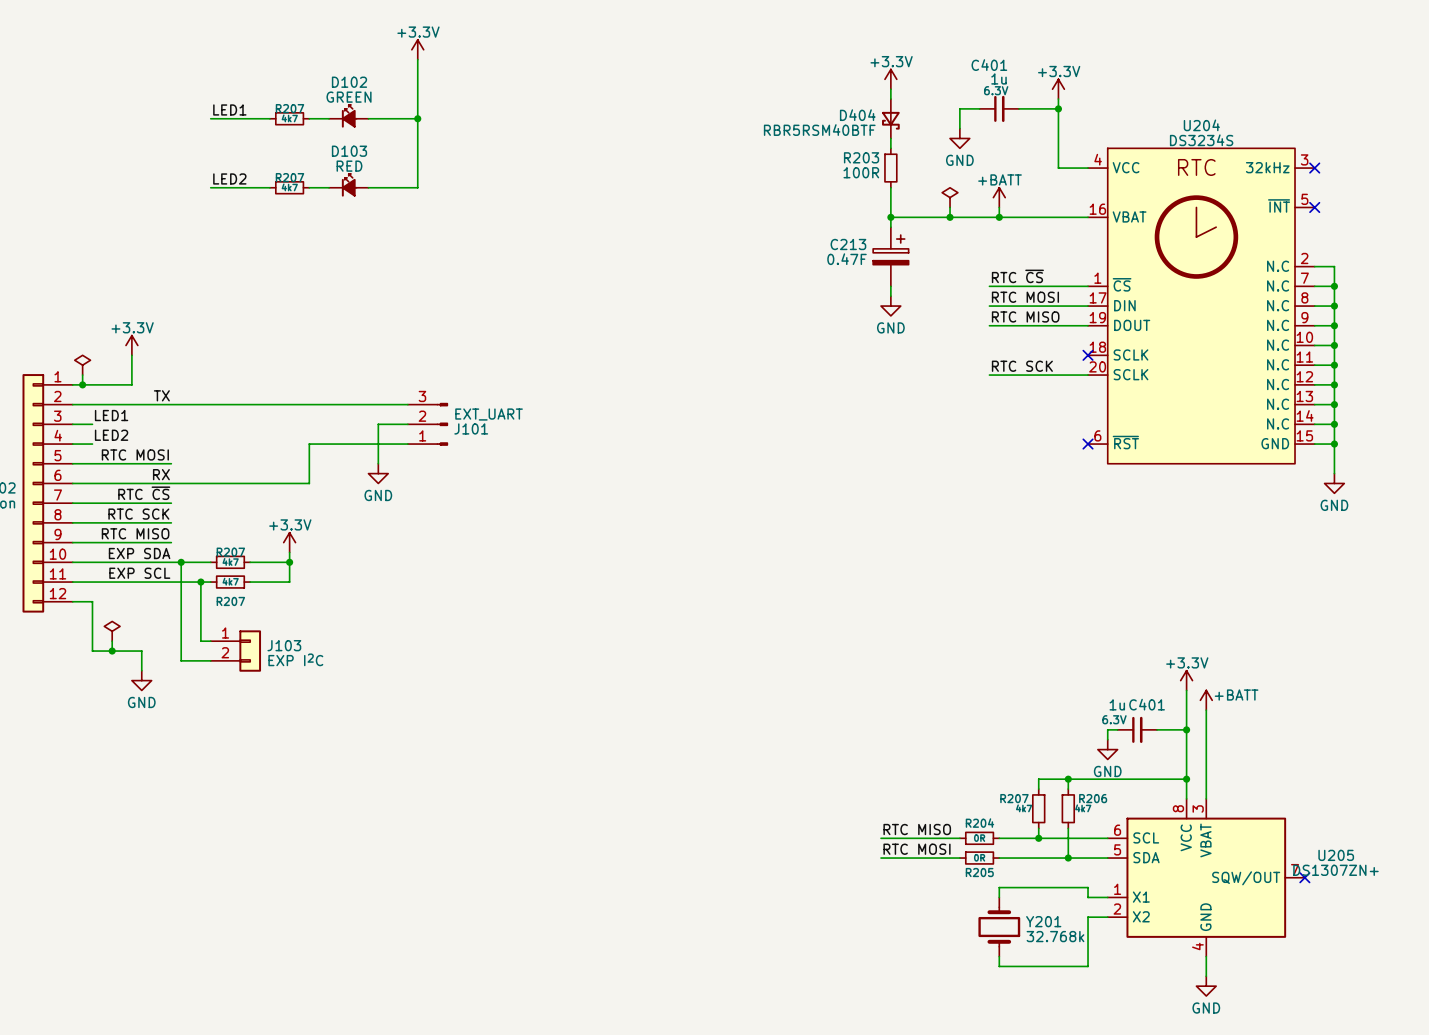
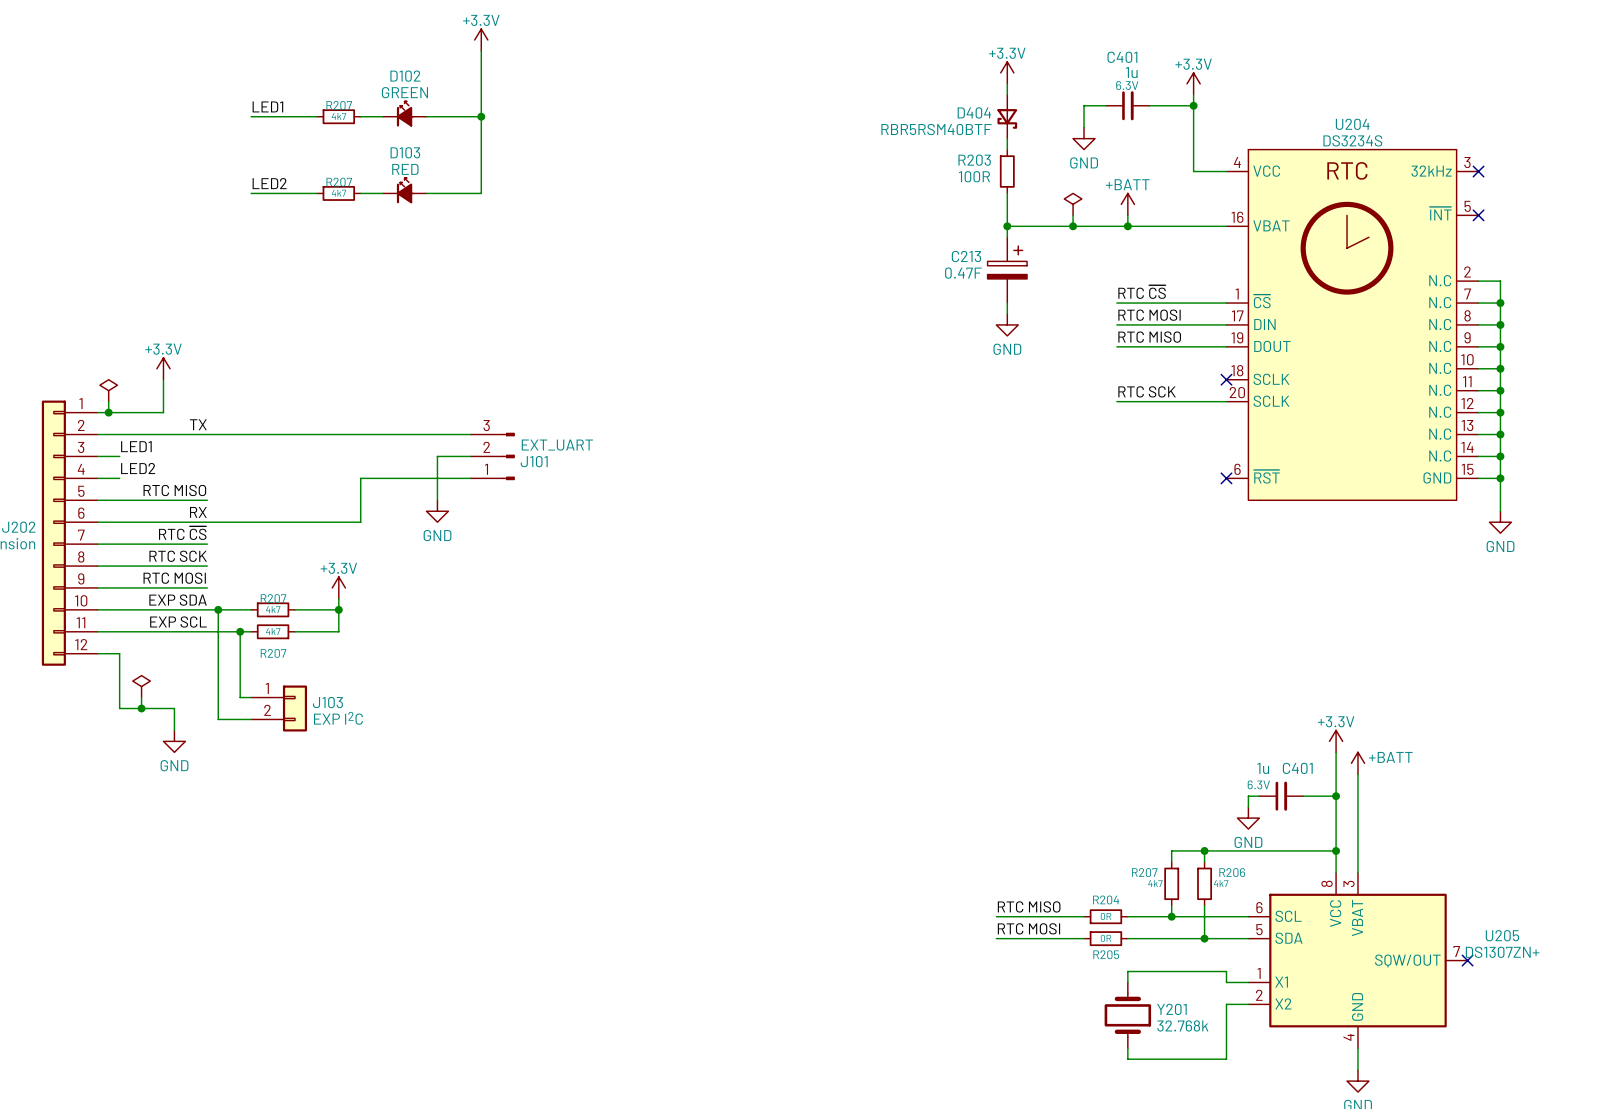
label: RTC MOSI (135, 454) -> RTC MISO (174, 490)
label: RTC MISO (135, 533) -> RTC MOSI (174, 578)

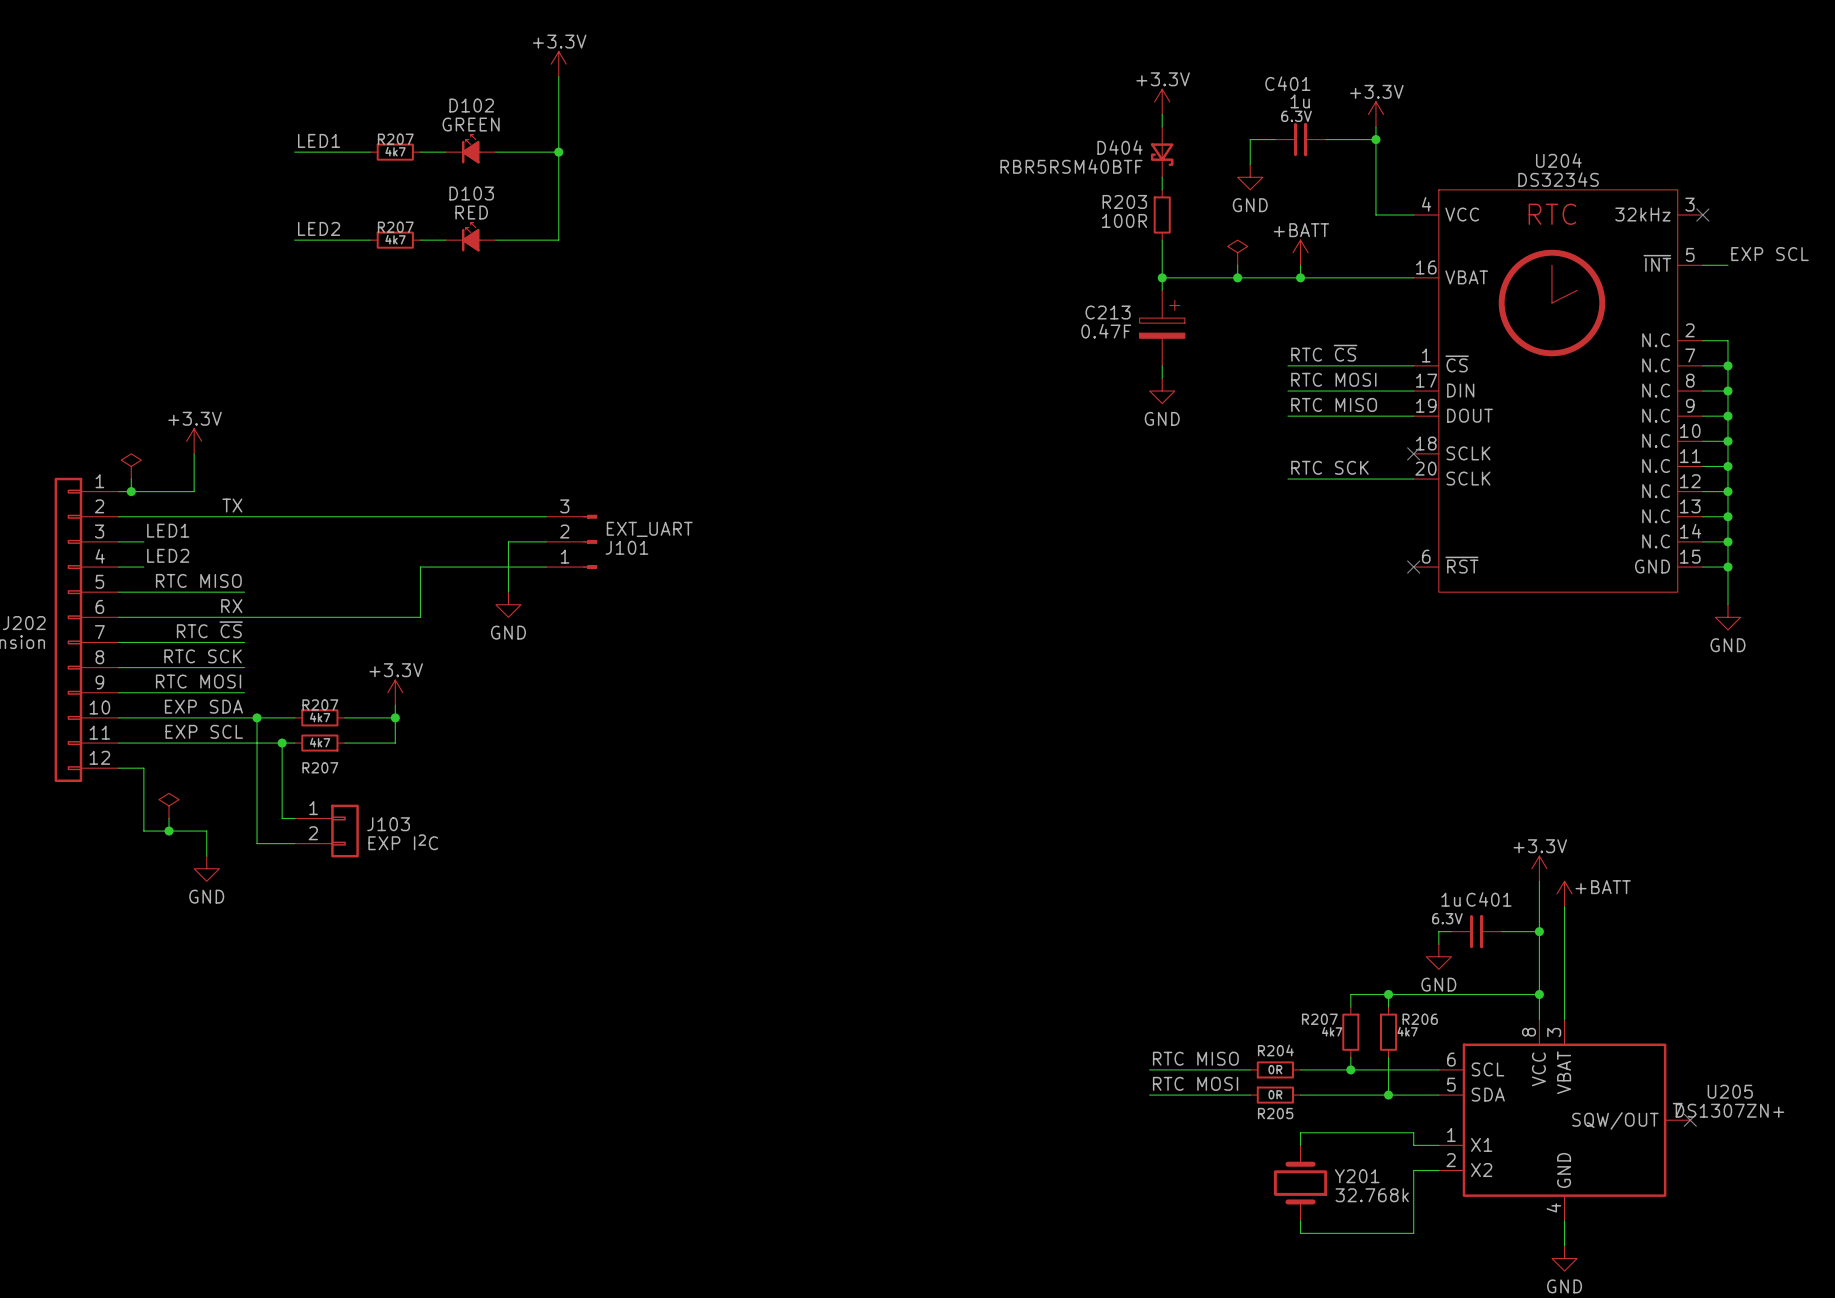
label: none -> EXP SCL (1770, 254)
wire: none -> (1702, 265) (1727, 265)
no-connect mark: (1478, 215) -> none

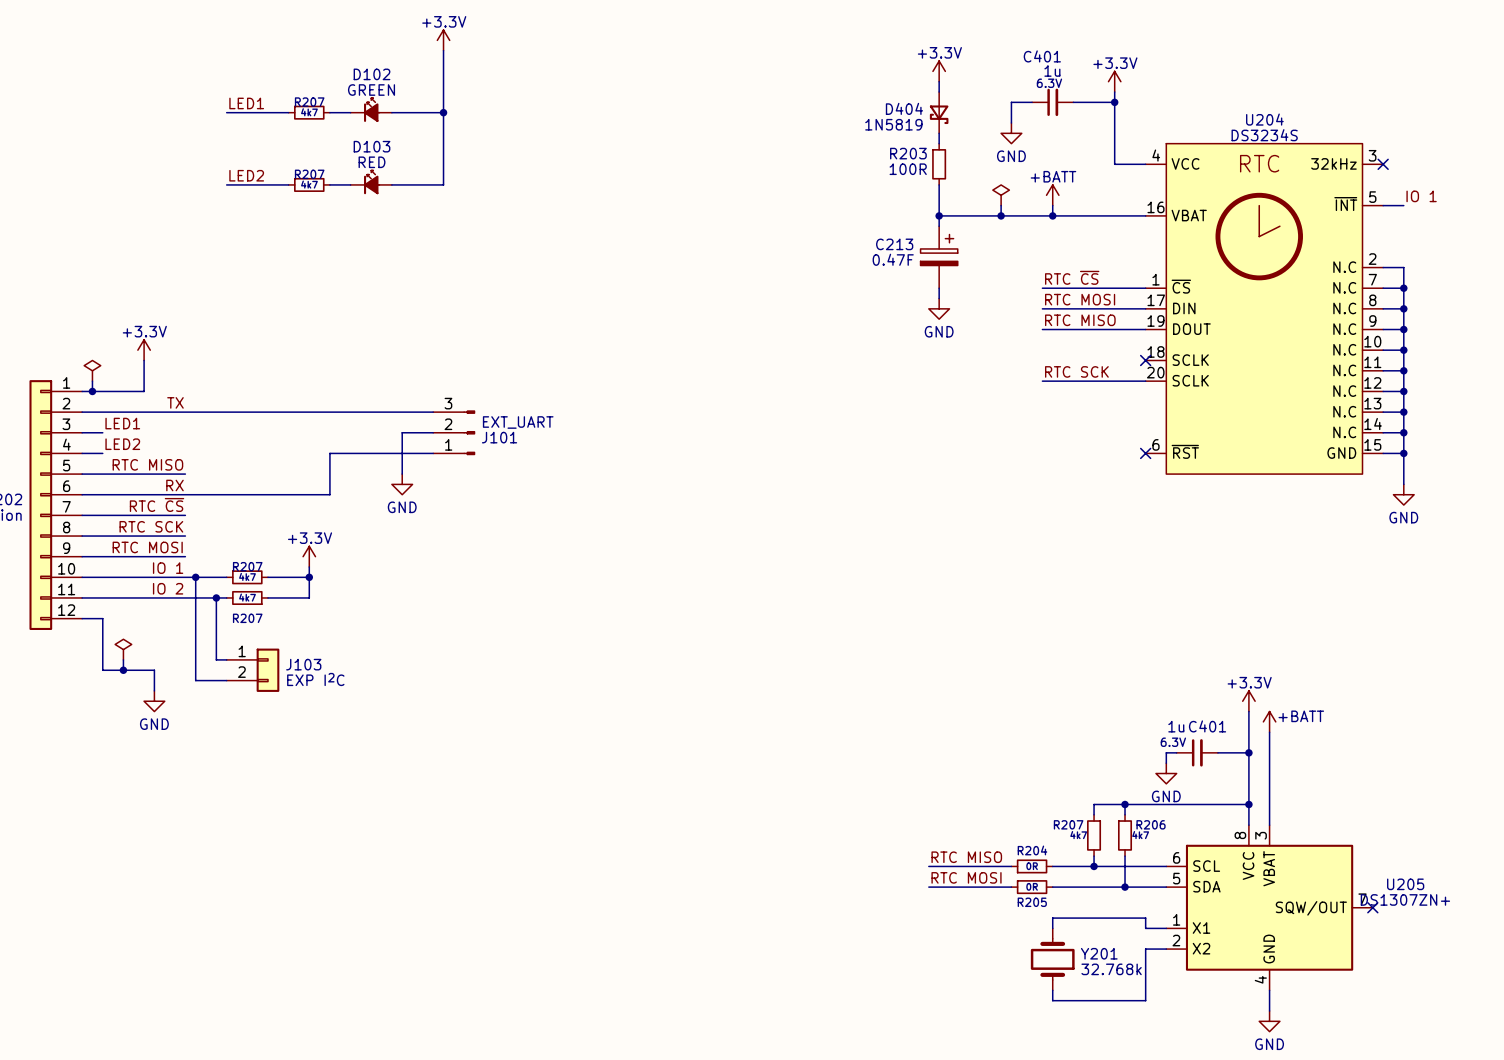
D404 value: RBR5RSM40BTF (1071, 166) -> 1N5819 (893, 124)
label: EXP SCL (1770, 254) -> IO 1 (1421, 196)
label: EXP SDA (203, 706) -> IO 1 (168, 568)
label: EXP SCL (204, 731) -> IO 2 (168, 588)

